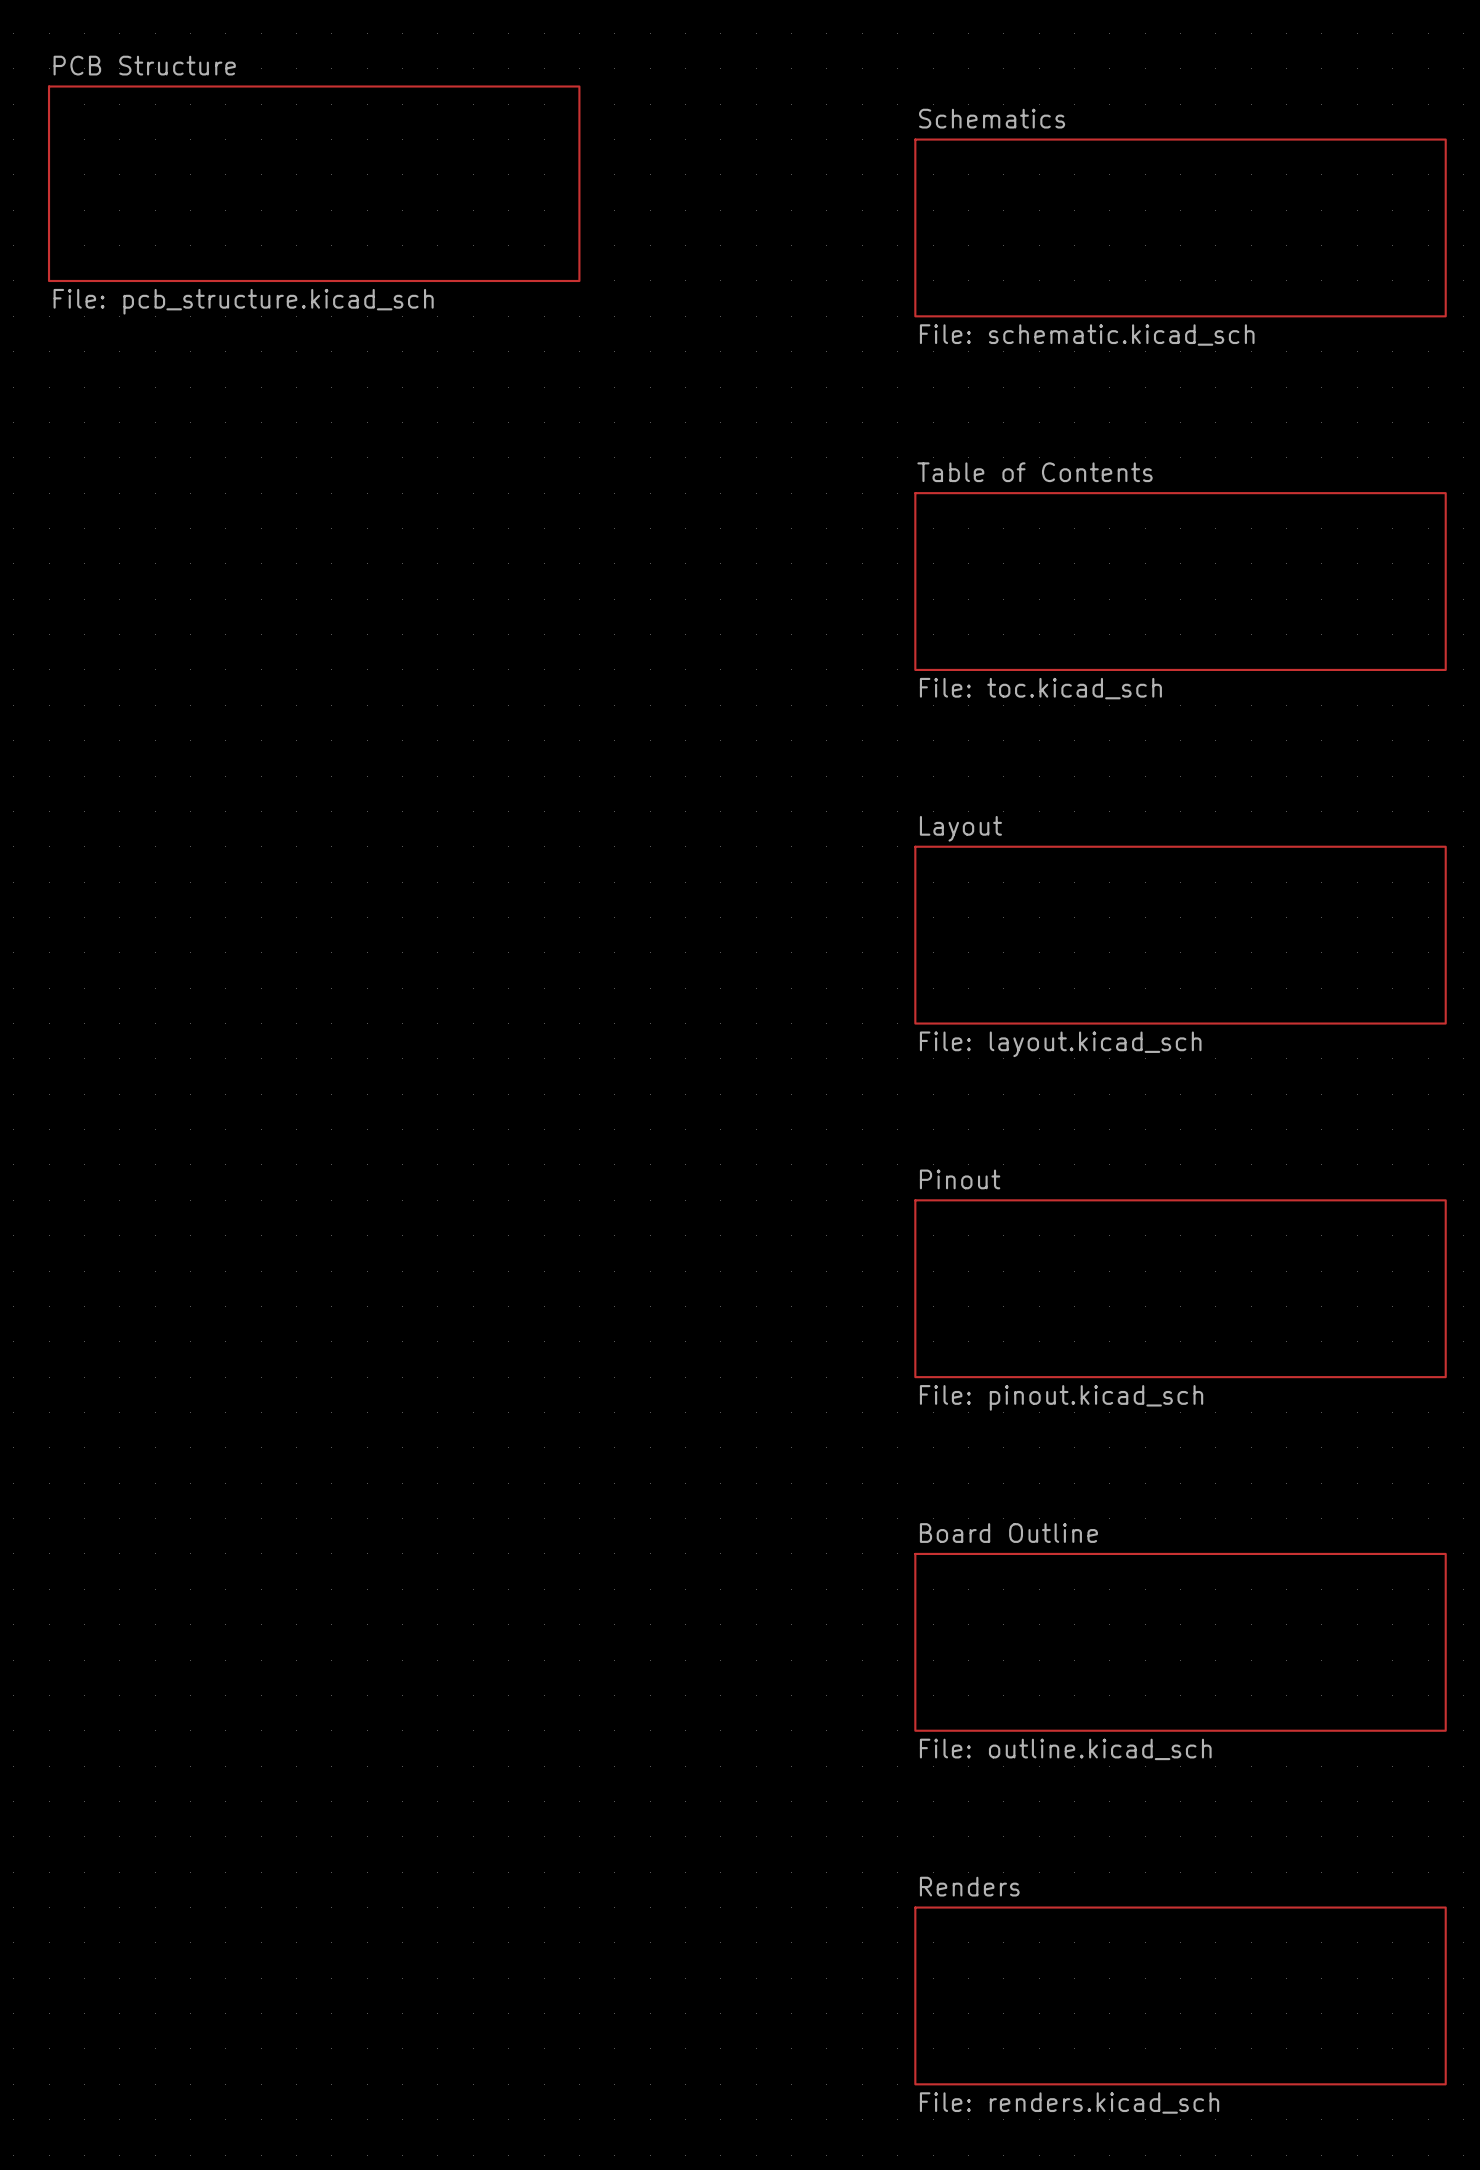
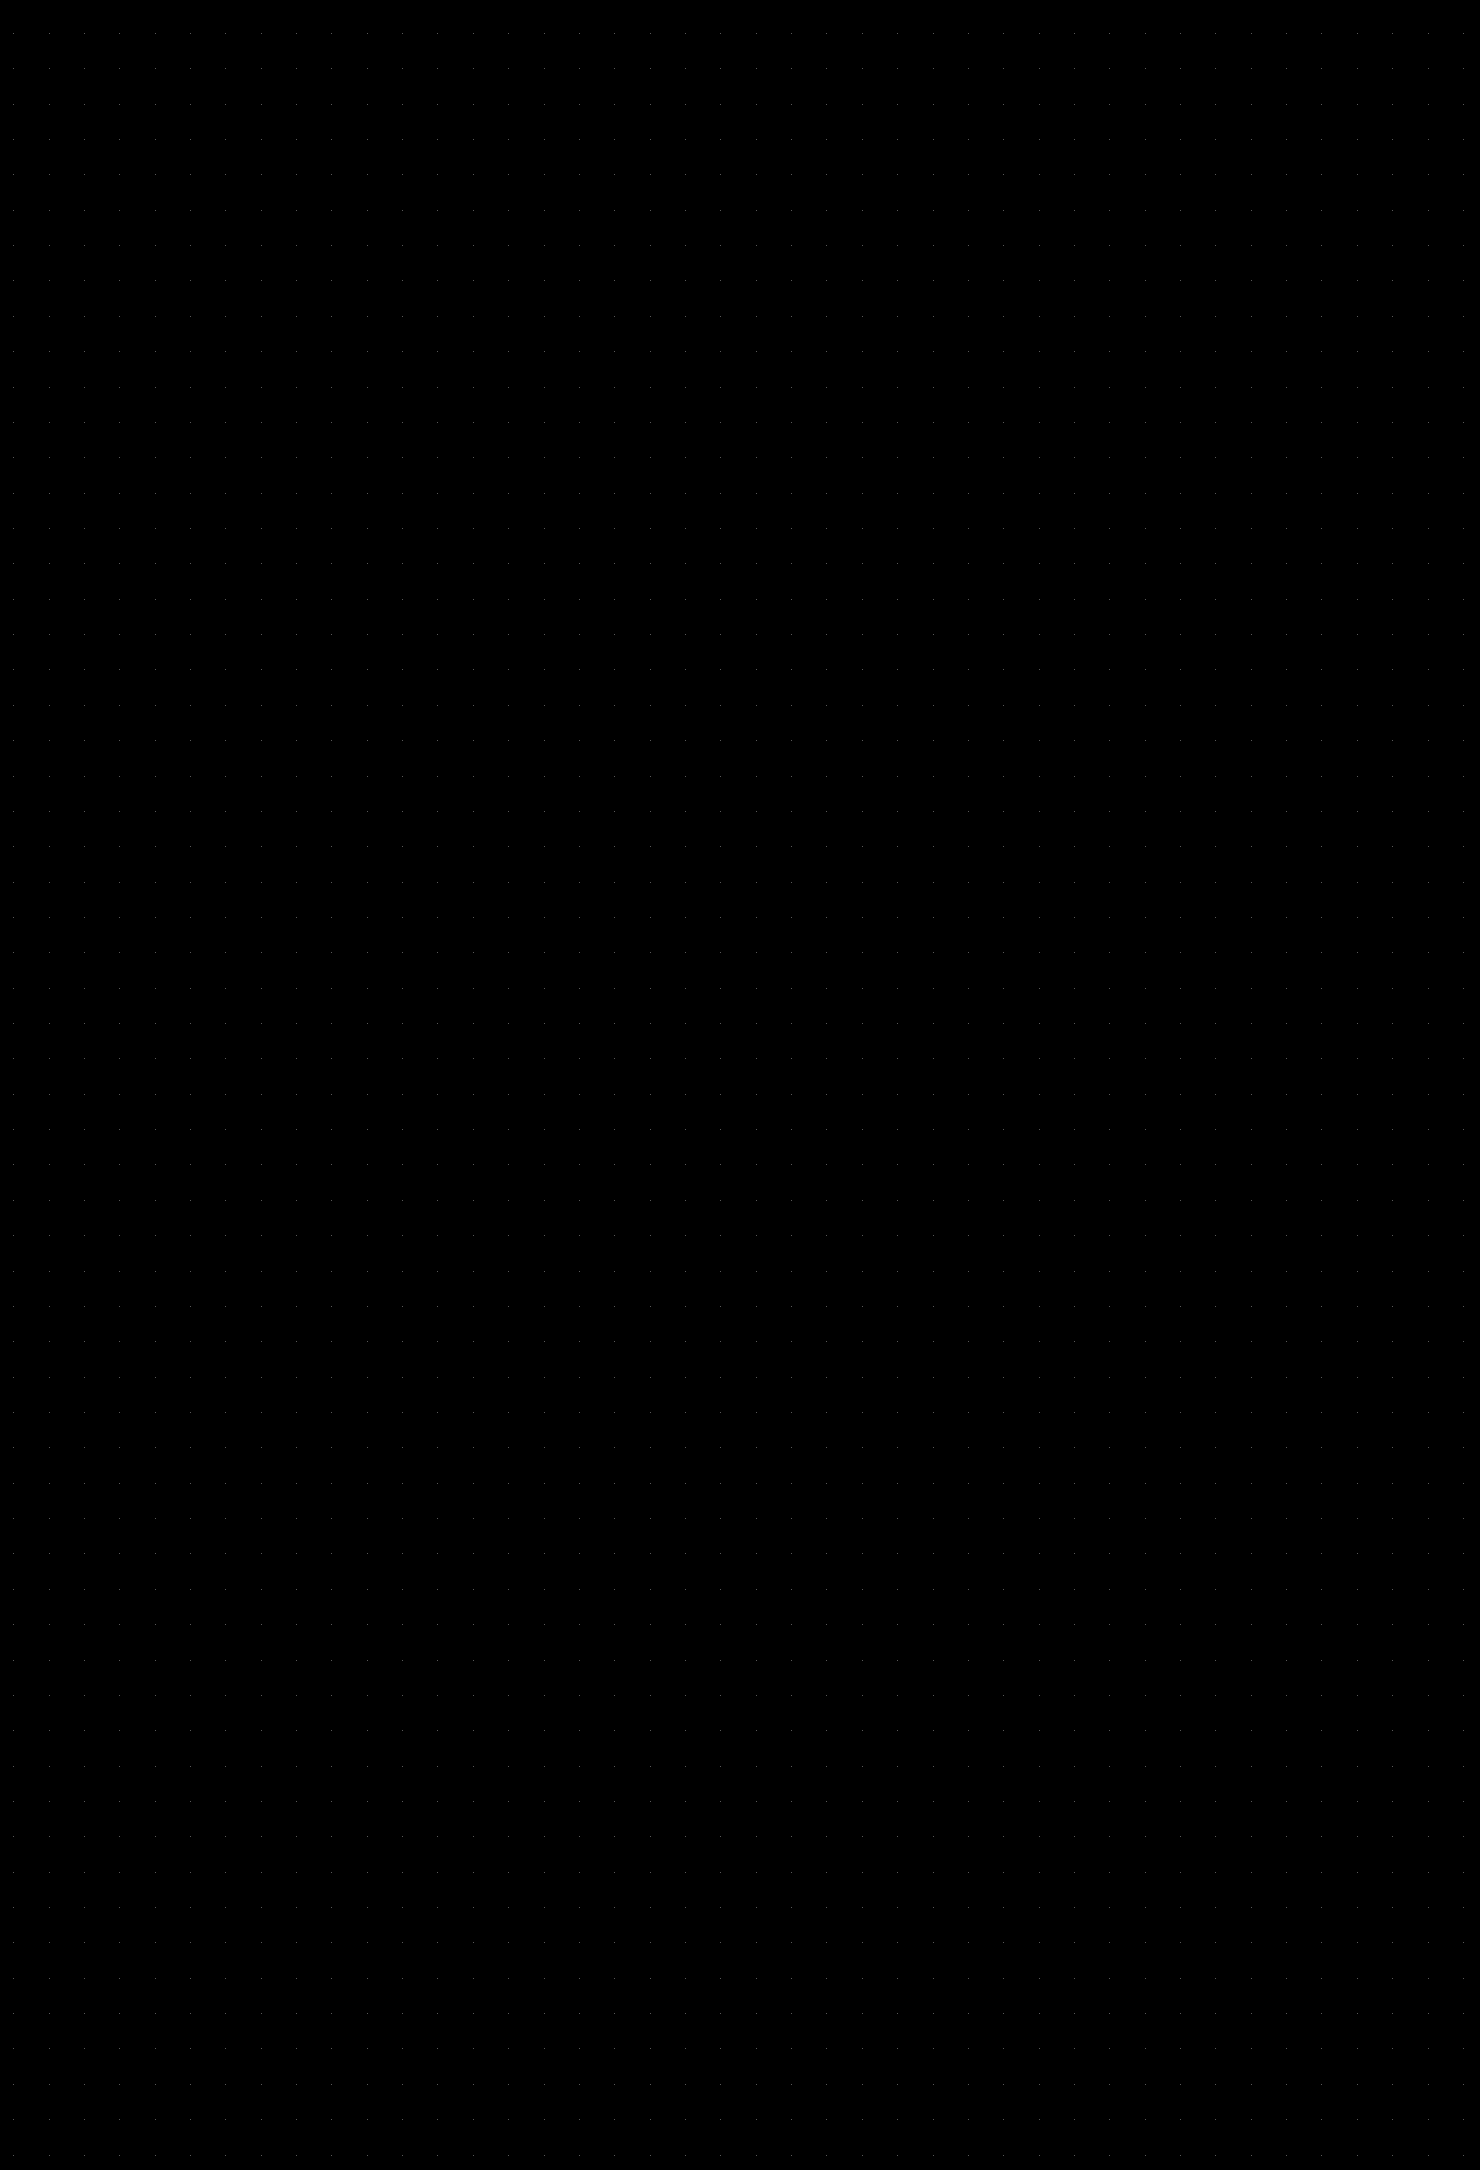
sheet PCB Structure: File: pcb_structure.kicad_sch (314, 183) -> none
sheet Schematics: File: schematic.kicad_sch (1180, 227) -> none
sheet Table of Contents: File: toc.kicad_sch (1180, 581) -> none
sheet Layout: File: layout.kicad_sch (1180, 935) -> none
sheet Pinout: File: pinout.kicad_sch (1180, 1288) -> none
sheet Board Outline: File: outline.kicad_sch (1180, 1642) -> none
sheet Renders: File: renders.kicad_sch (1180, 1995) -> none

